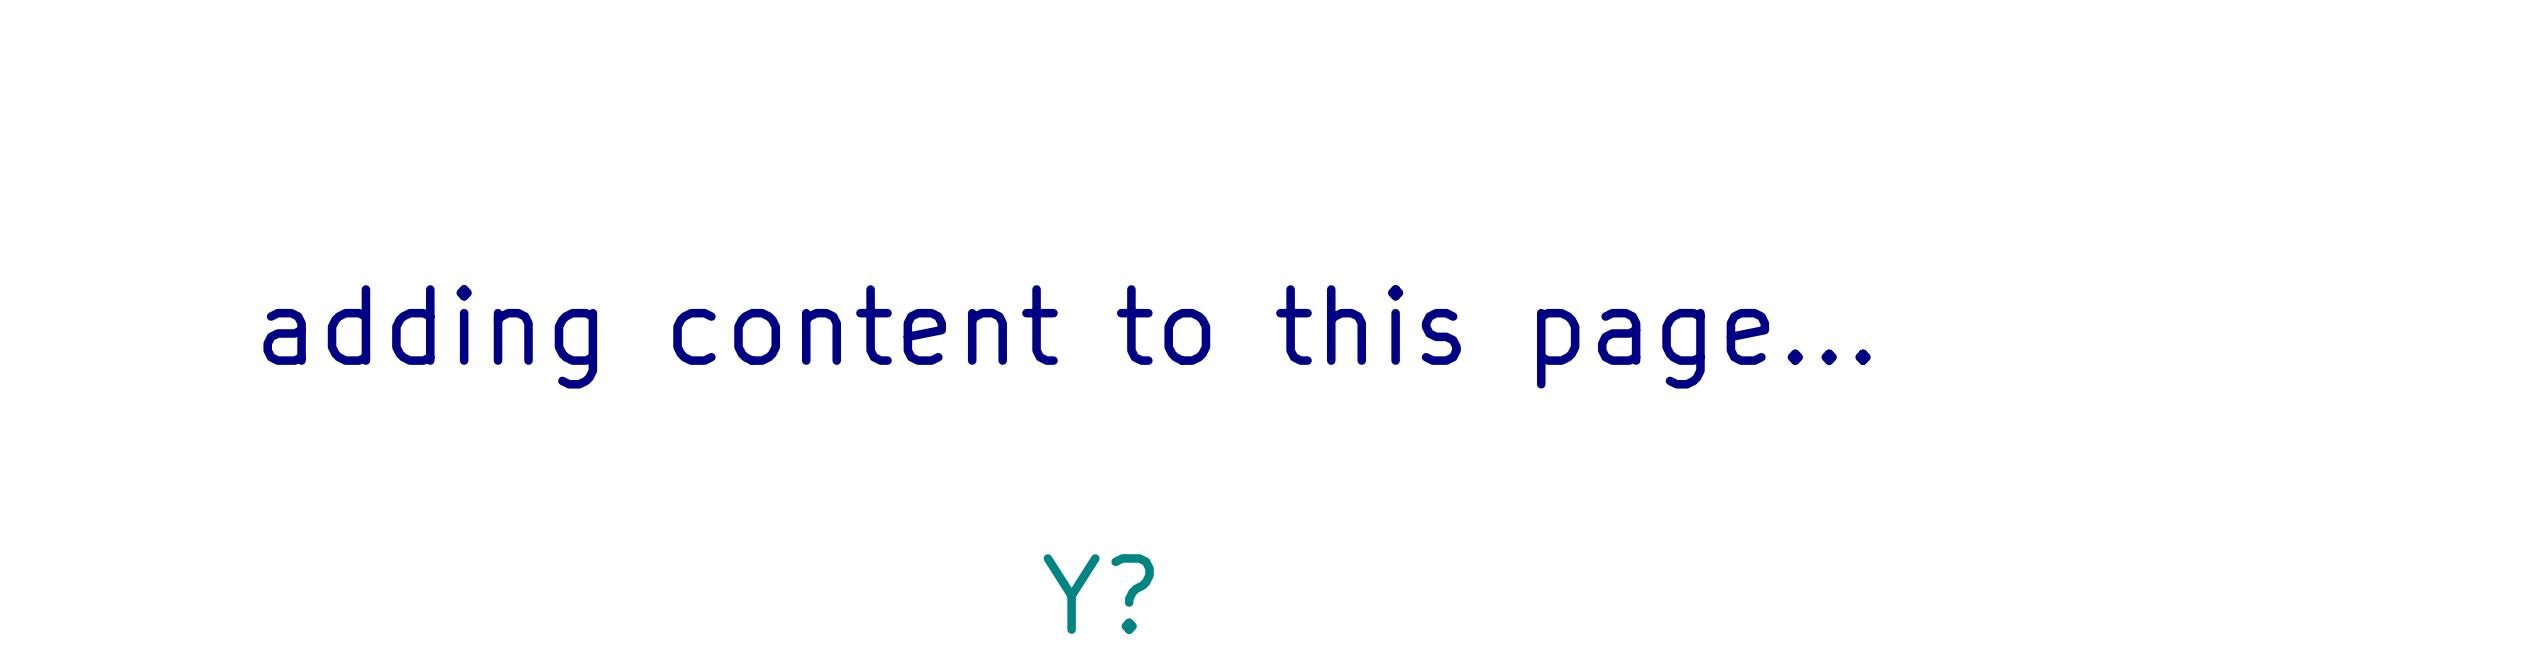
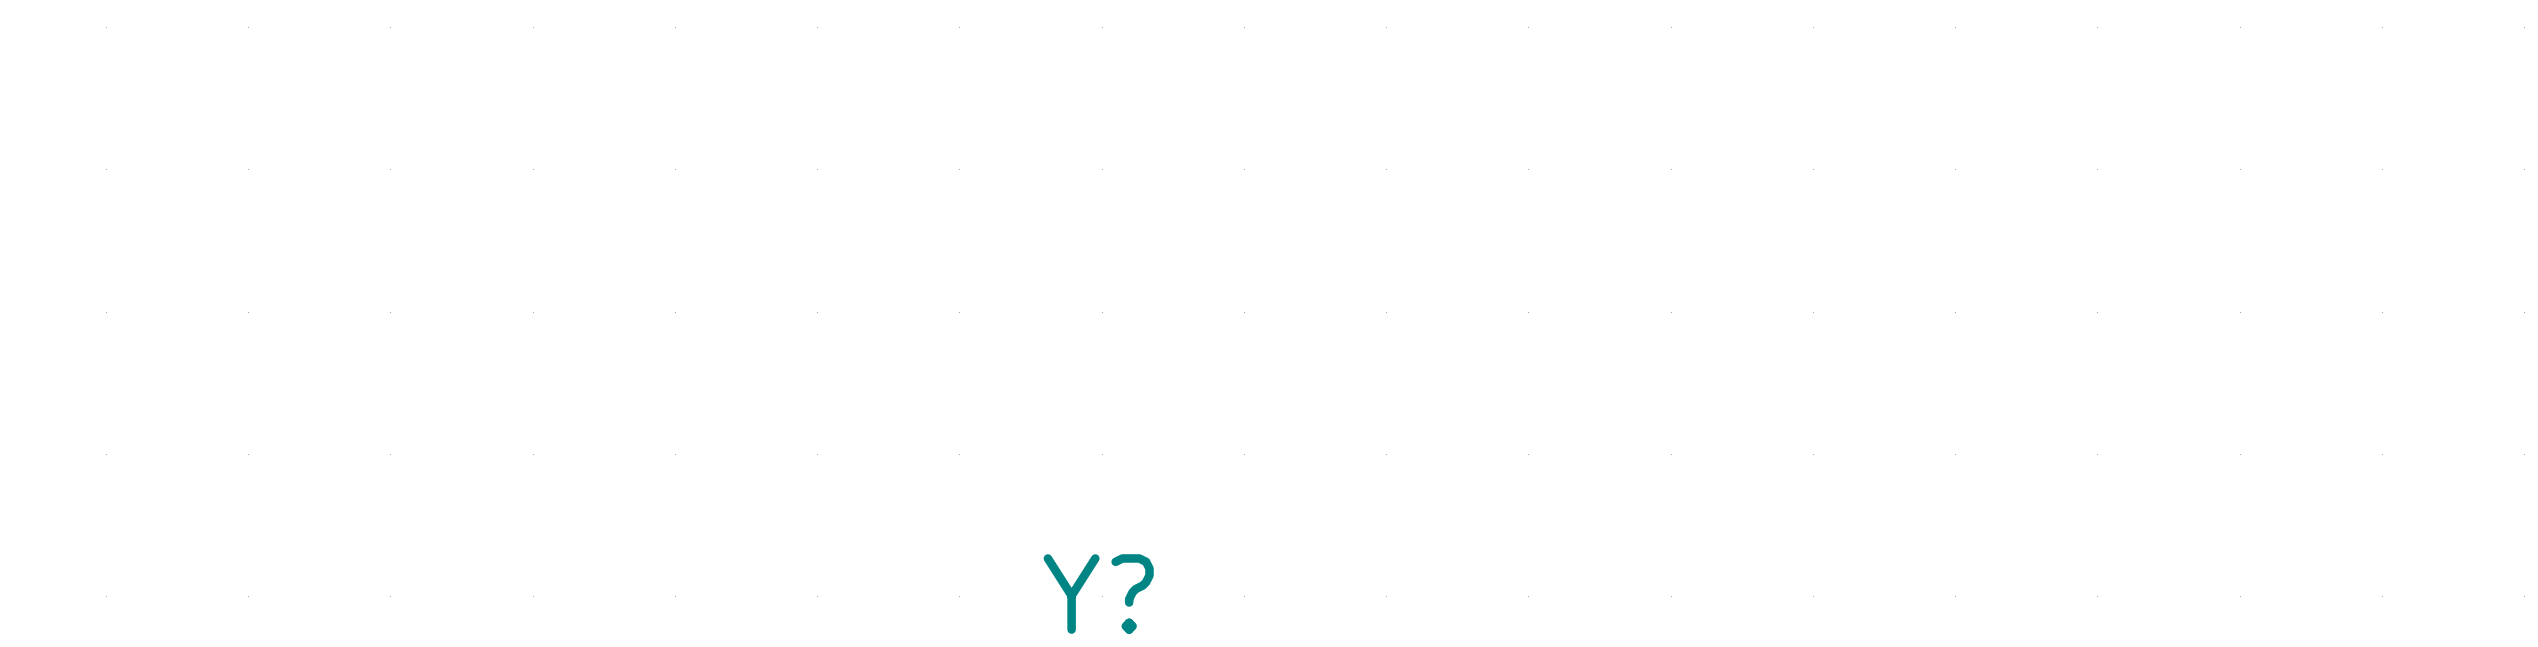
text: adding content to this page... (1067, 336) -> none

